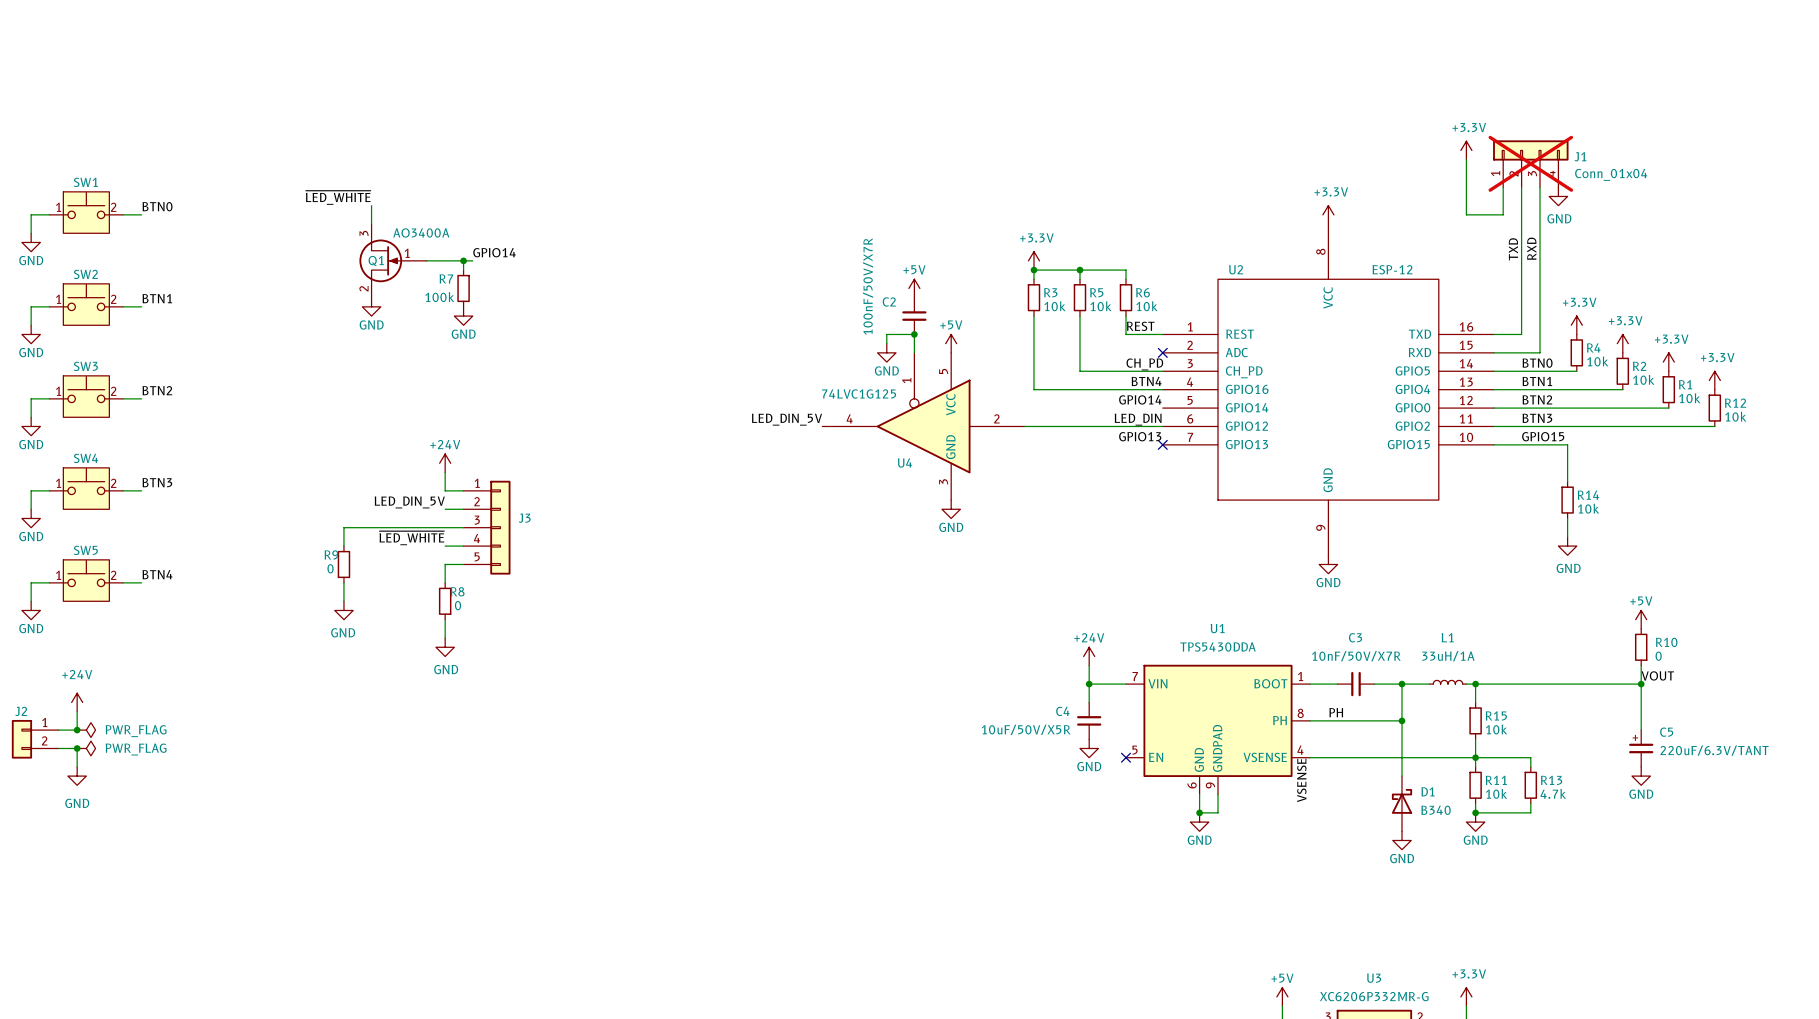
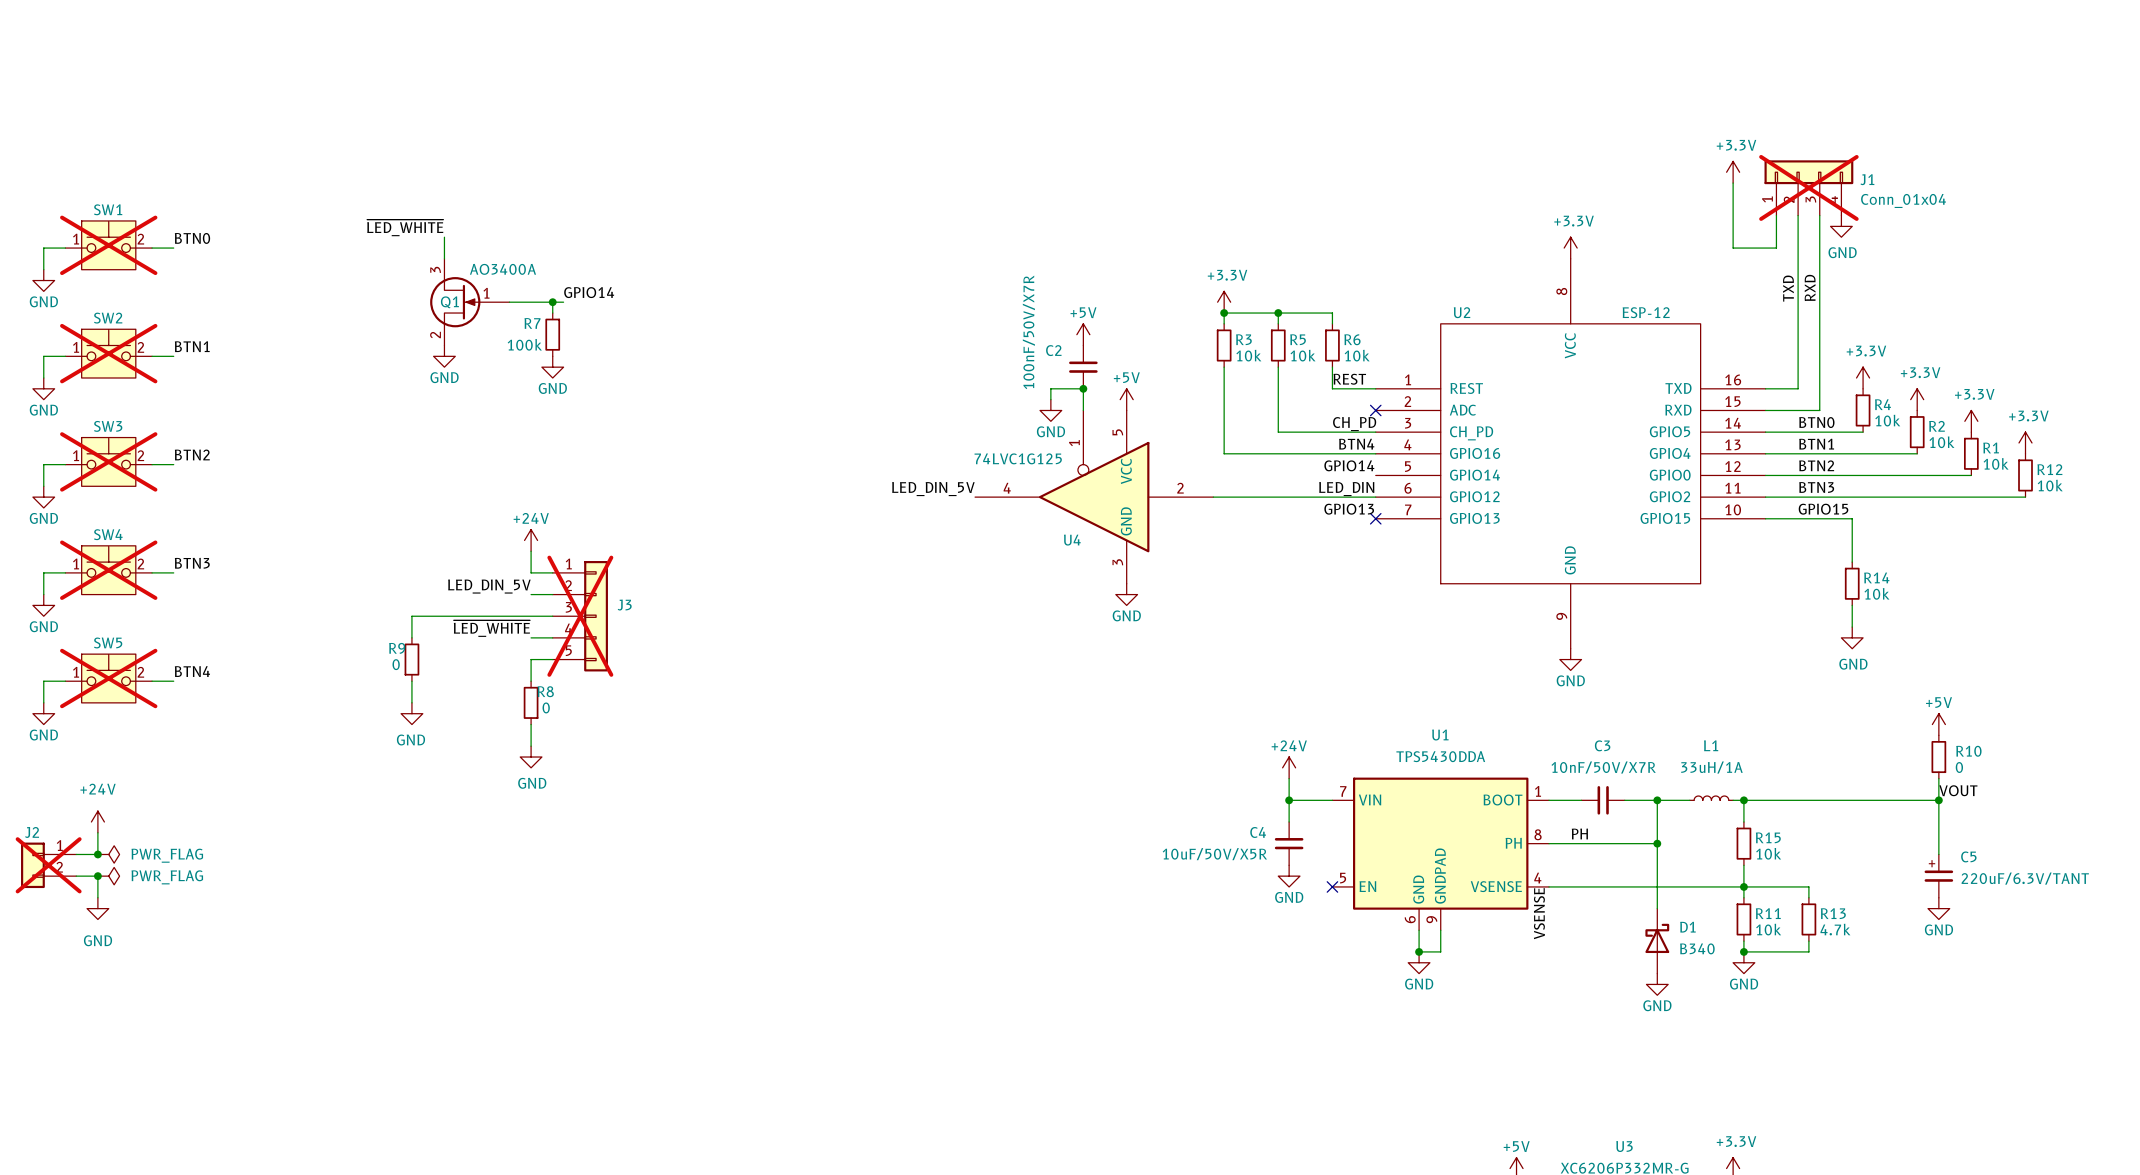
SW1 do-not-place cross: none -> (108, 245)
SW2 do-not-place cross: none -> (108, 353)
SW3 do-not-place cross: none -> (108, 461)
SW4 do-not-place cross: none -> (108, 570)
J3 do-not-place cross: none -> (580, 616)
SW5 do-not-place cross: none -> (108, 678)
J2 do-not-place cross: none -> (48, 865)

